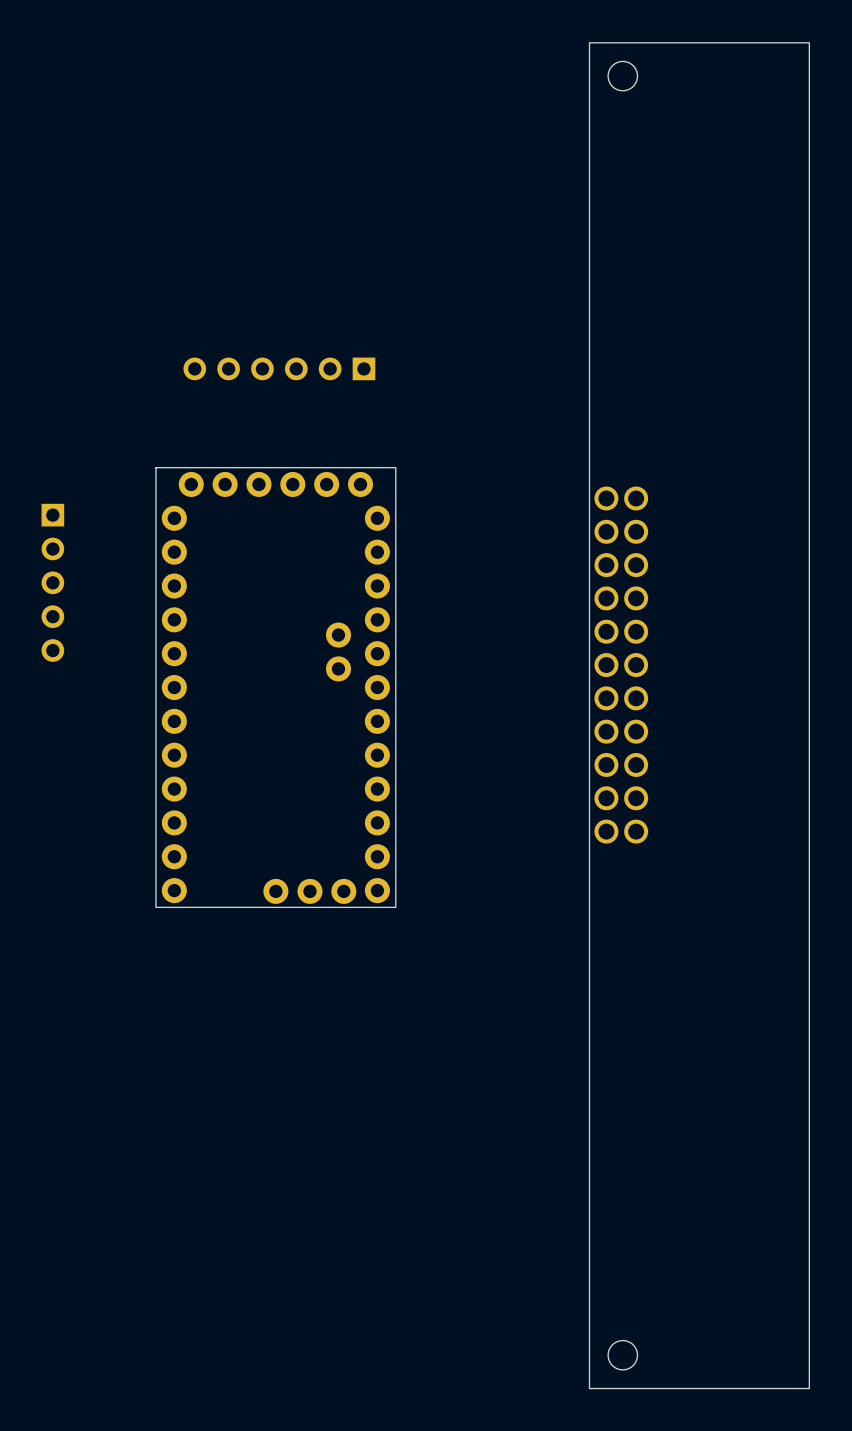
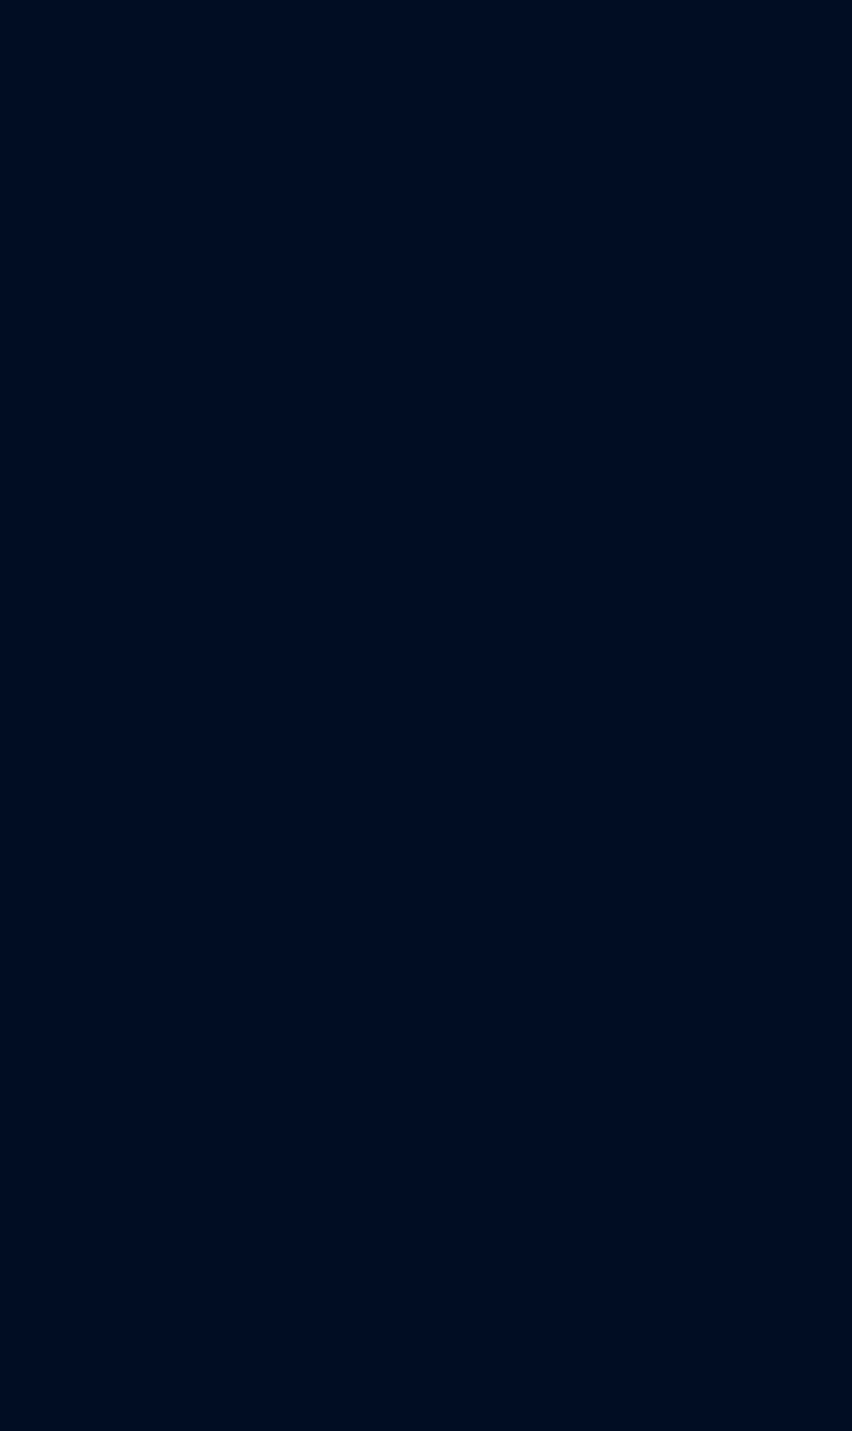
part: (279, 368) -> none
part: (52, 582) -> none
part: (275, 687) -> none
part: (699, 715) -> none

